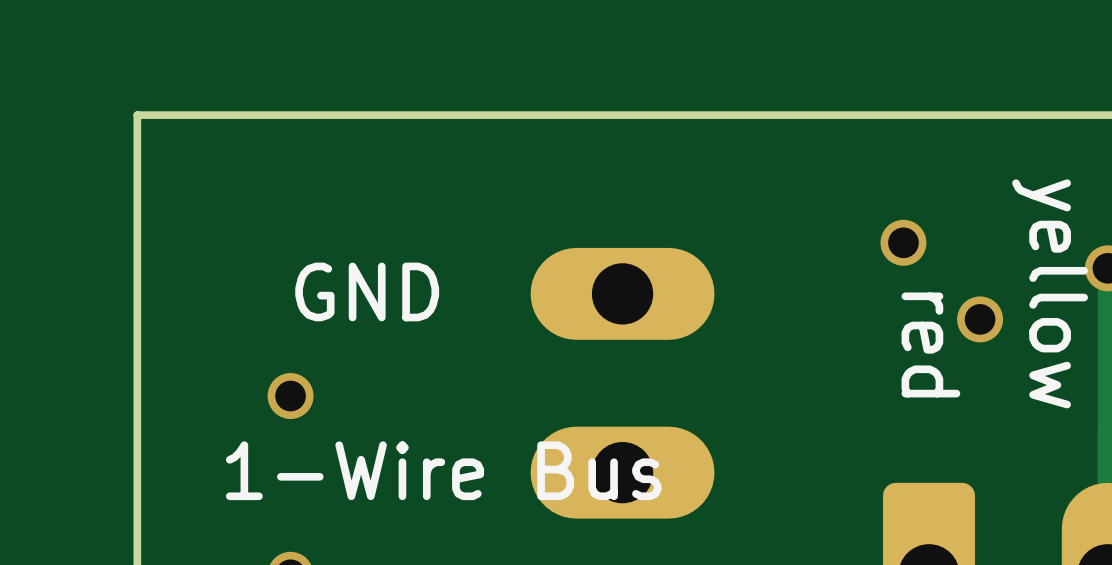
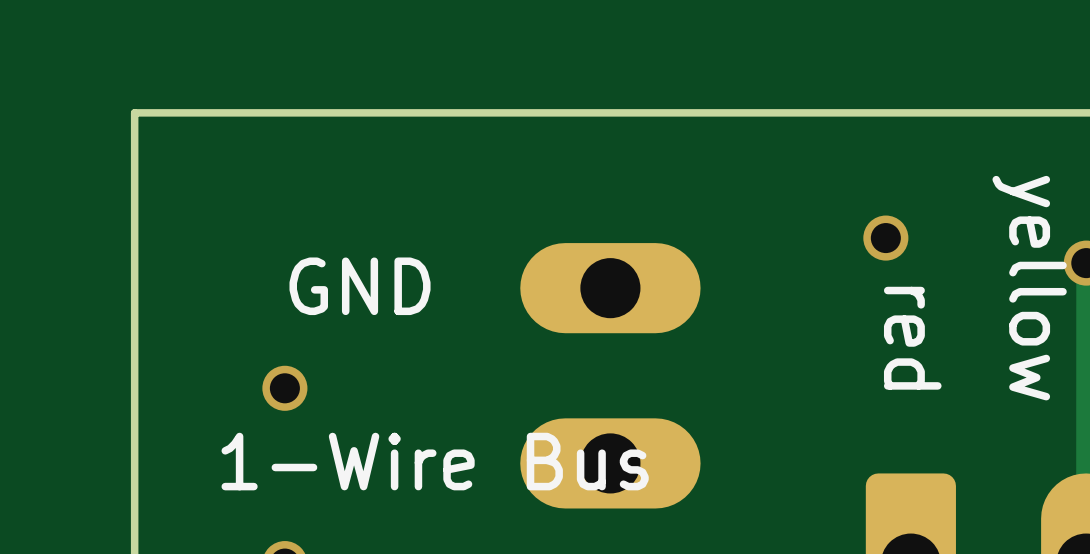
via: (980, 319) -> none

